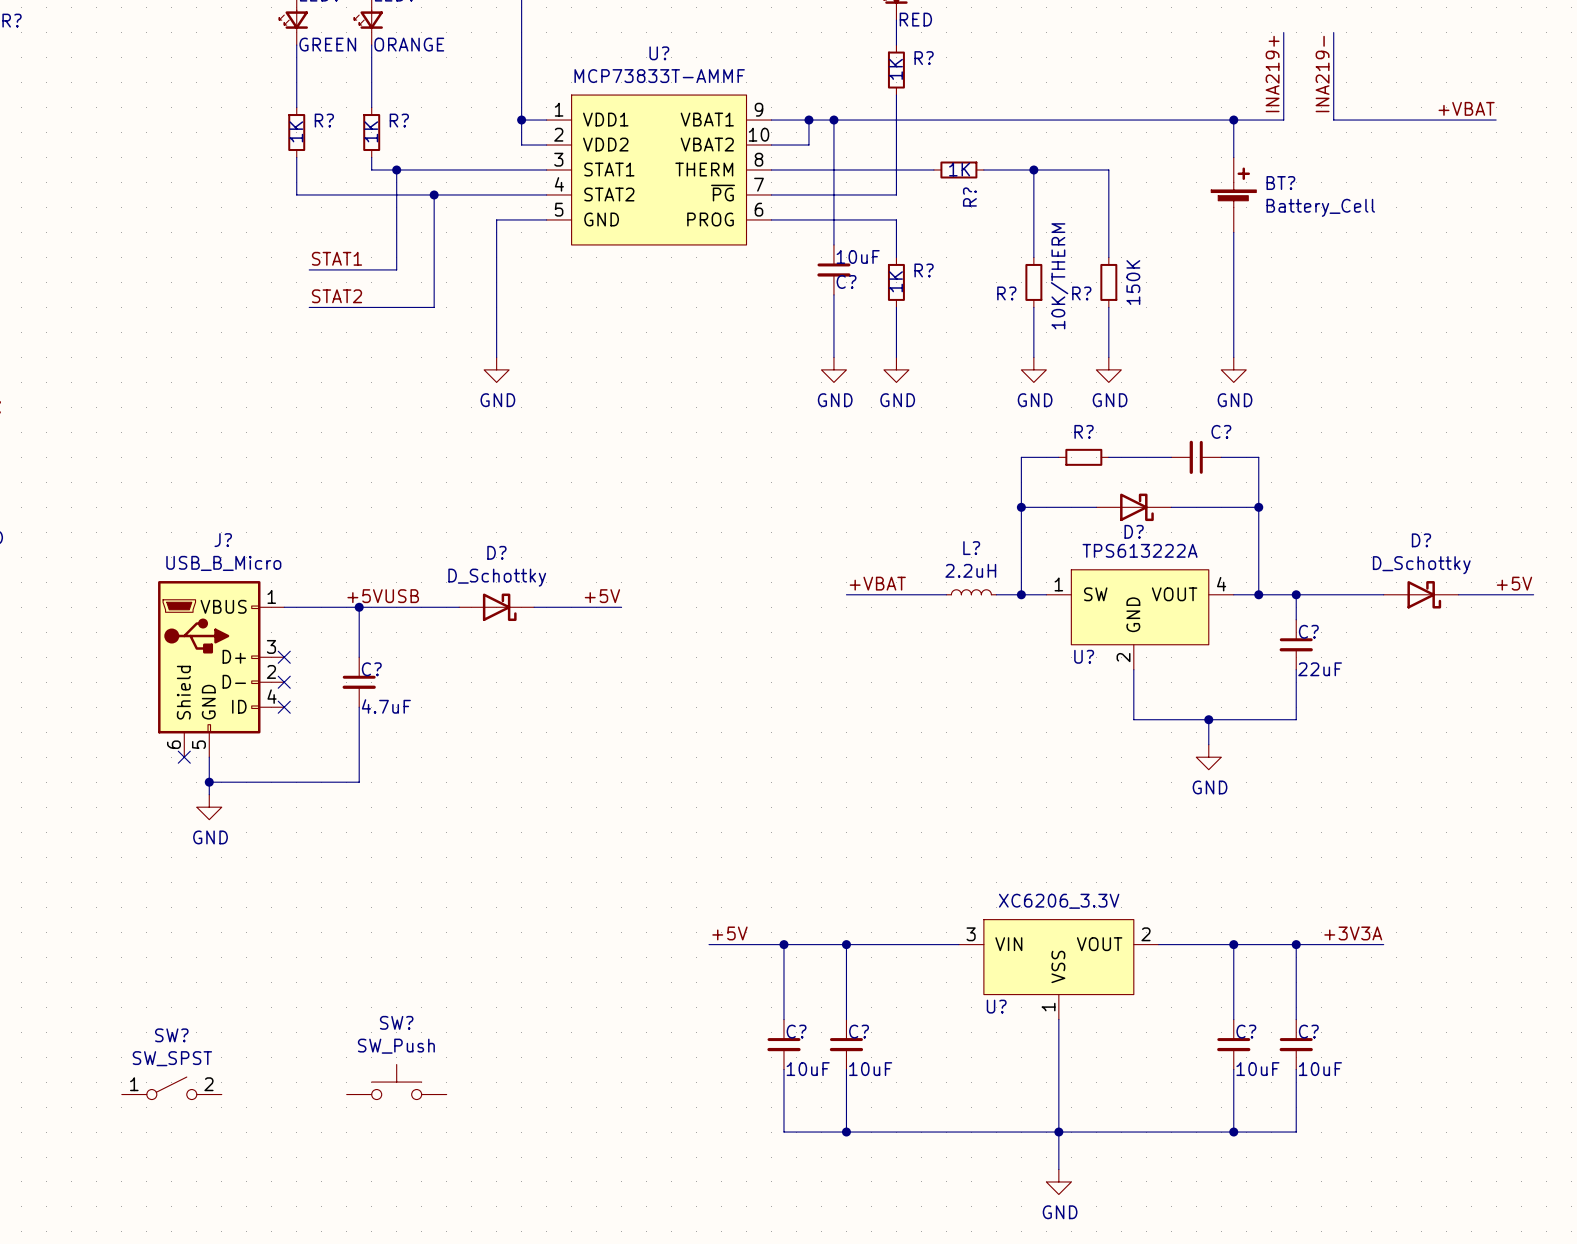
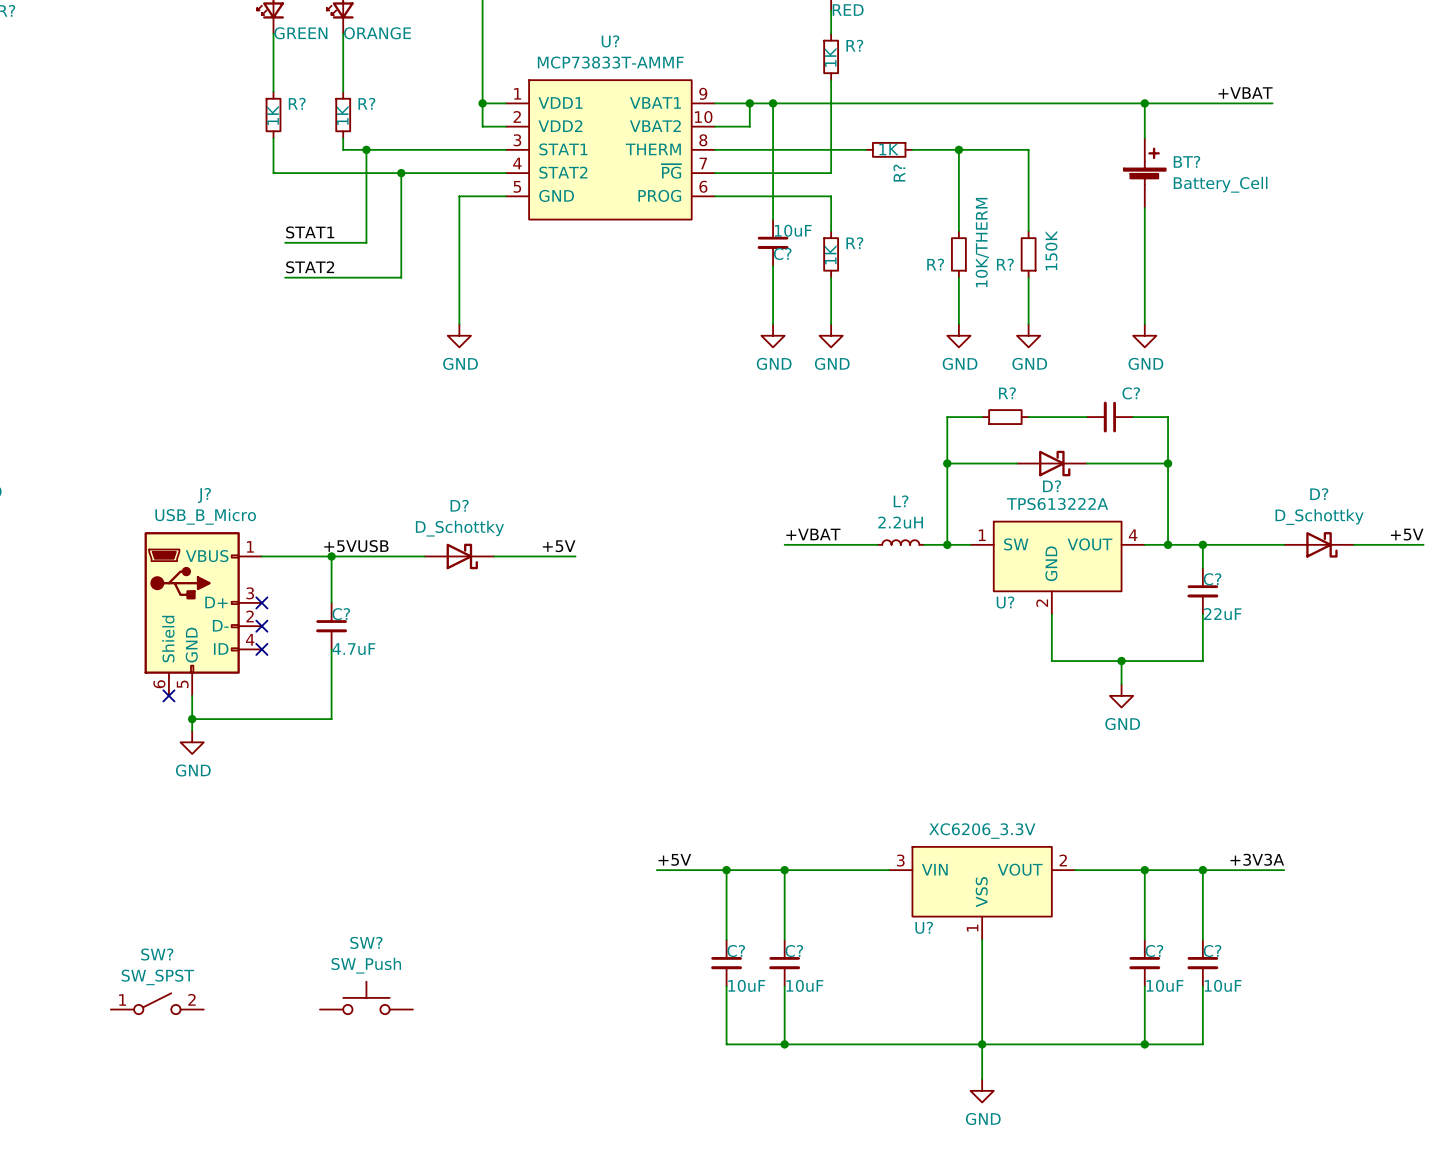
wire: (1283, 32) (1283, 120) -> (1237, 103) (1191, 103)
wire: (1333, 32) (1333, 120) -> none
label: INA219+ (1272, 74) -> none
label: INA219- (1322, 74) -> none
label position: +VBAT (1466, 108) -> +VBAT (1245, 93)
wire: (1371, 120) (1496, 120) -> none

